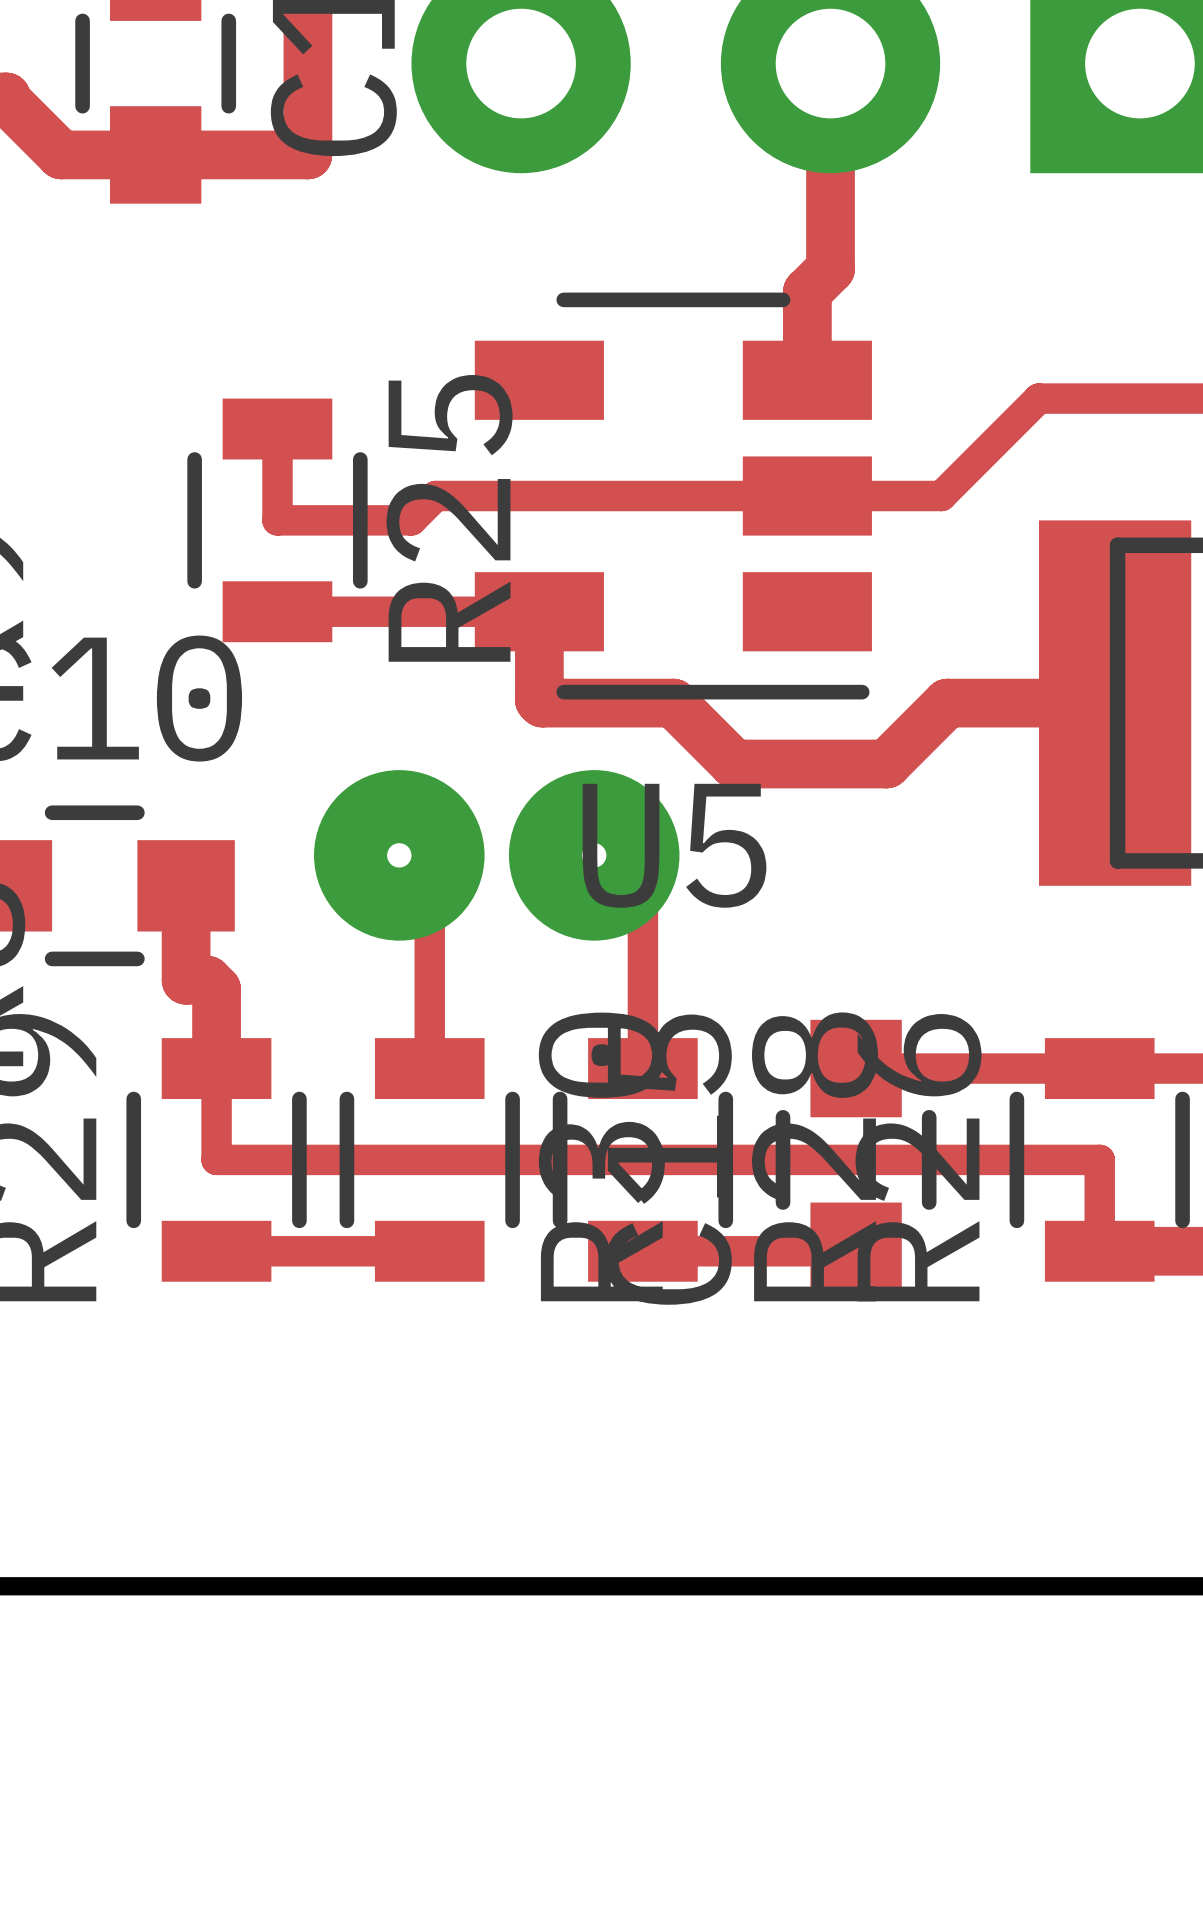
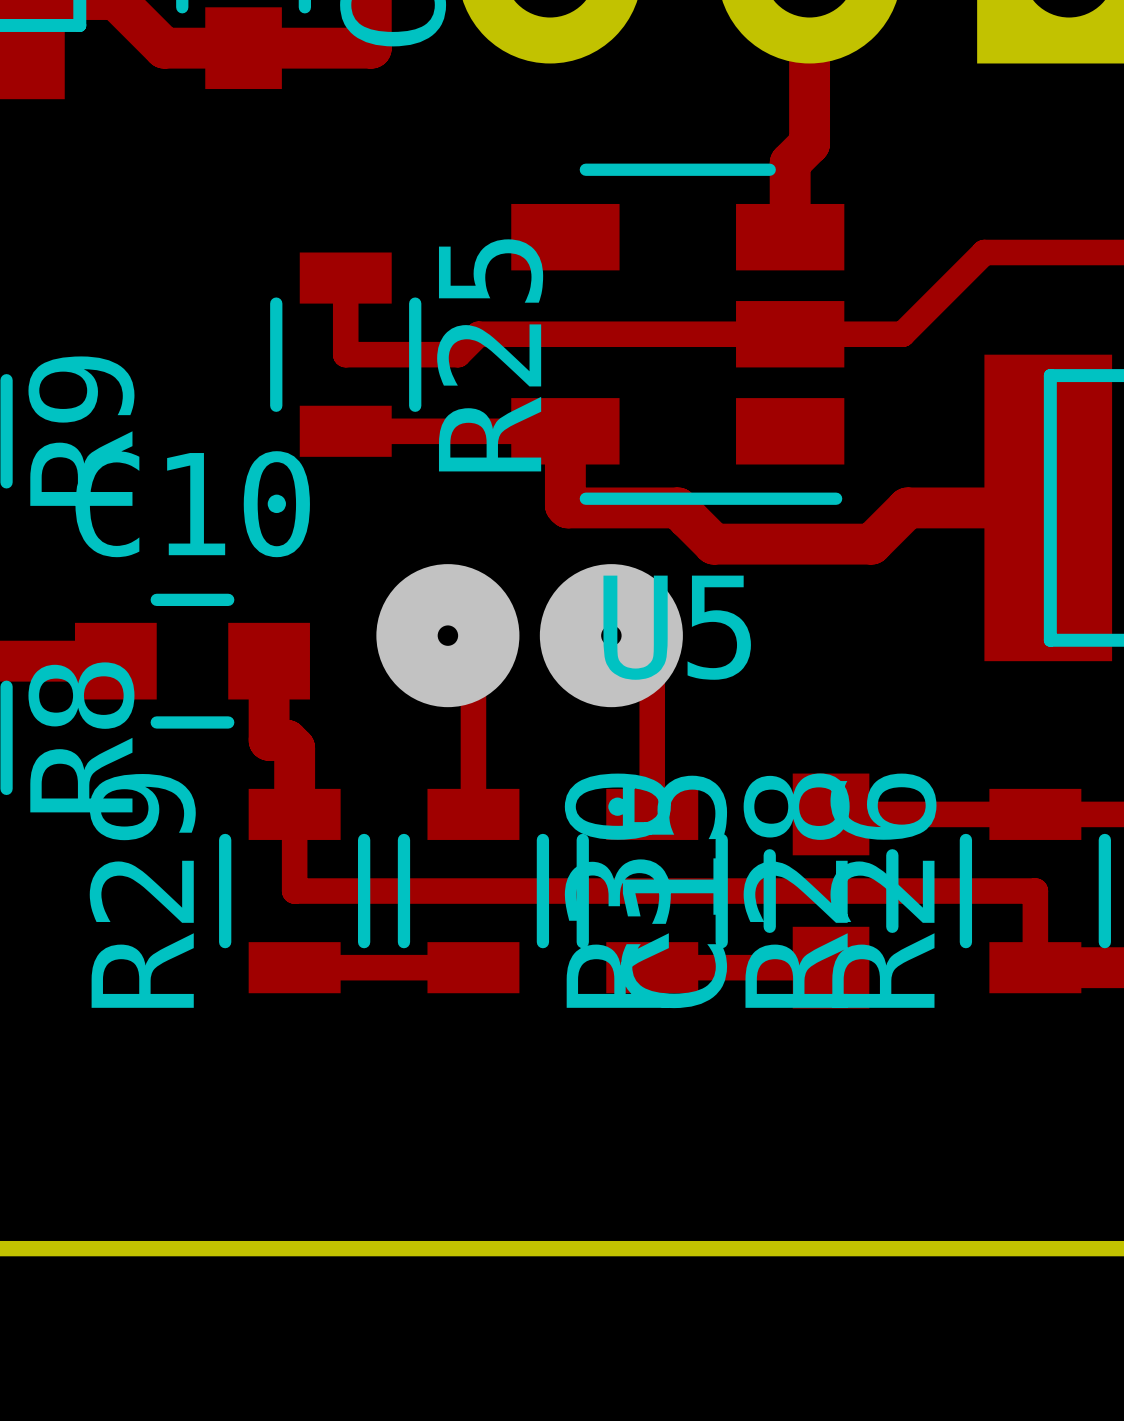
track: (716, 746) (734, 764) (886, 764) (904, 746) -> (714, 544) (871, 544)

